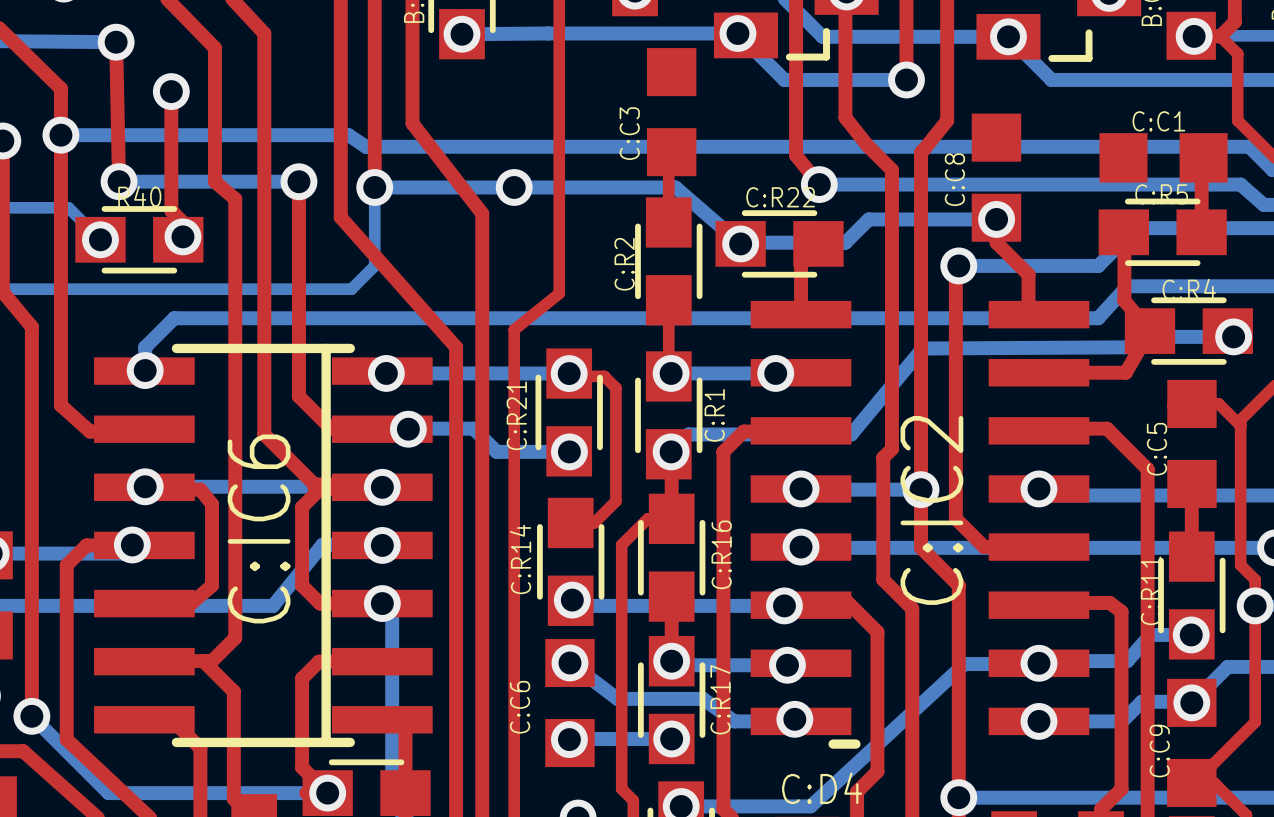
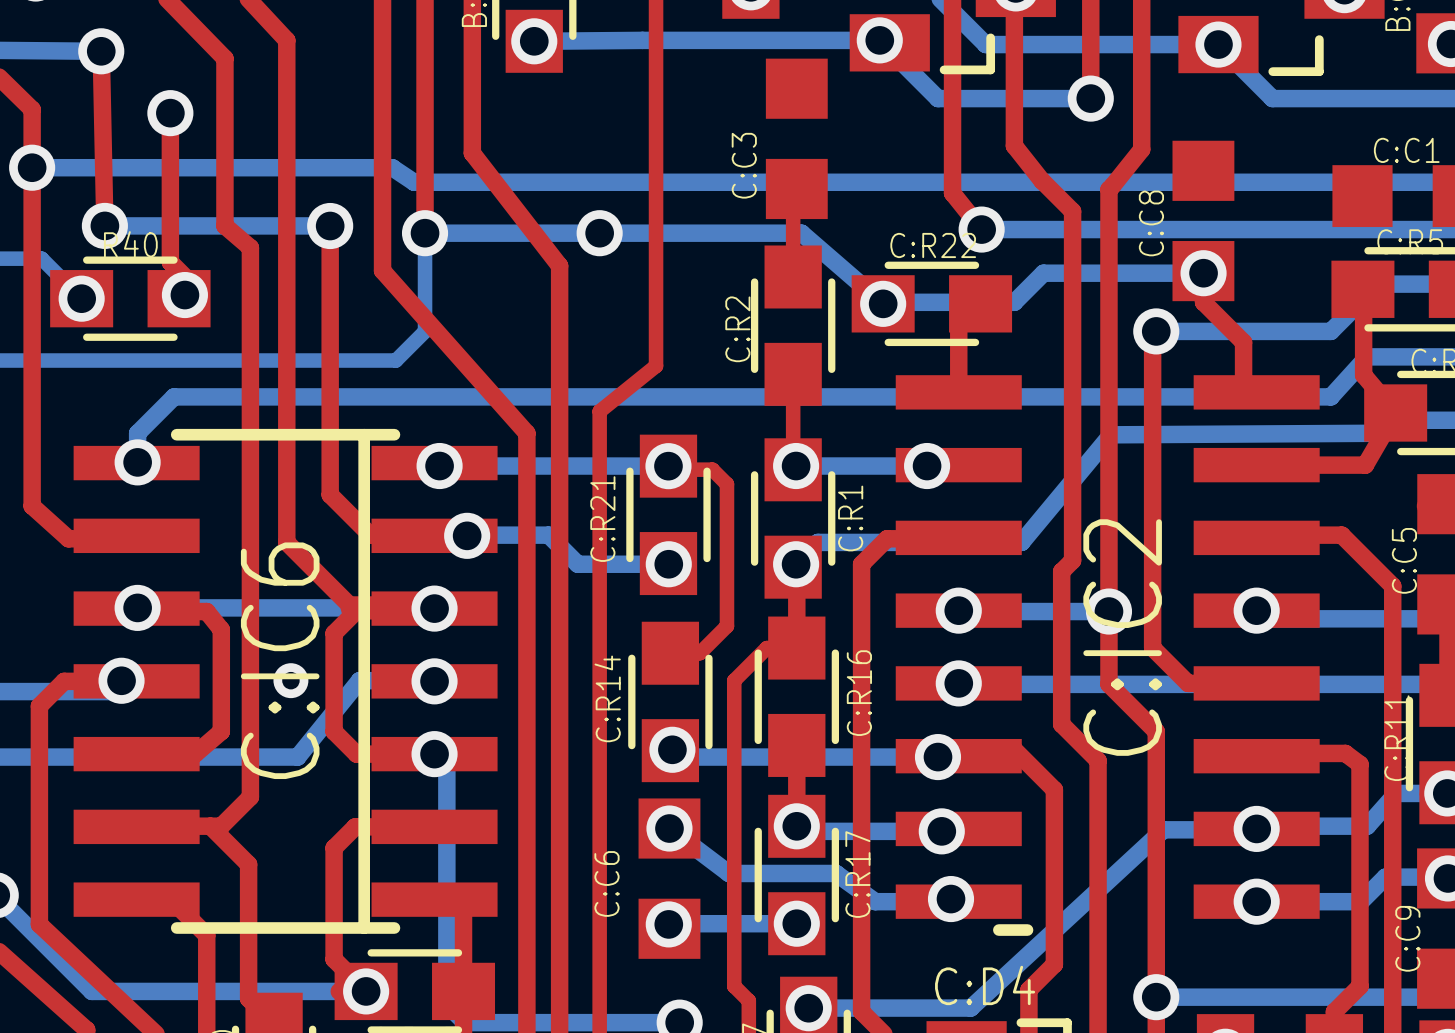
via: none -> (290, 680)

